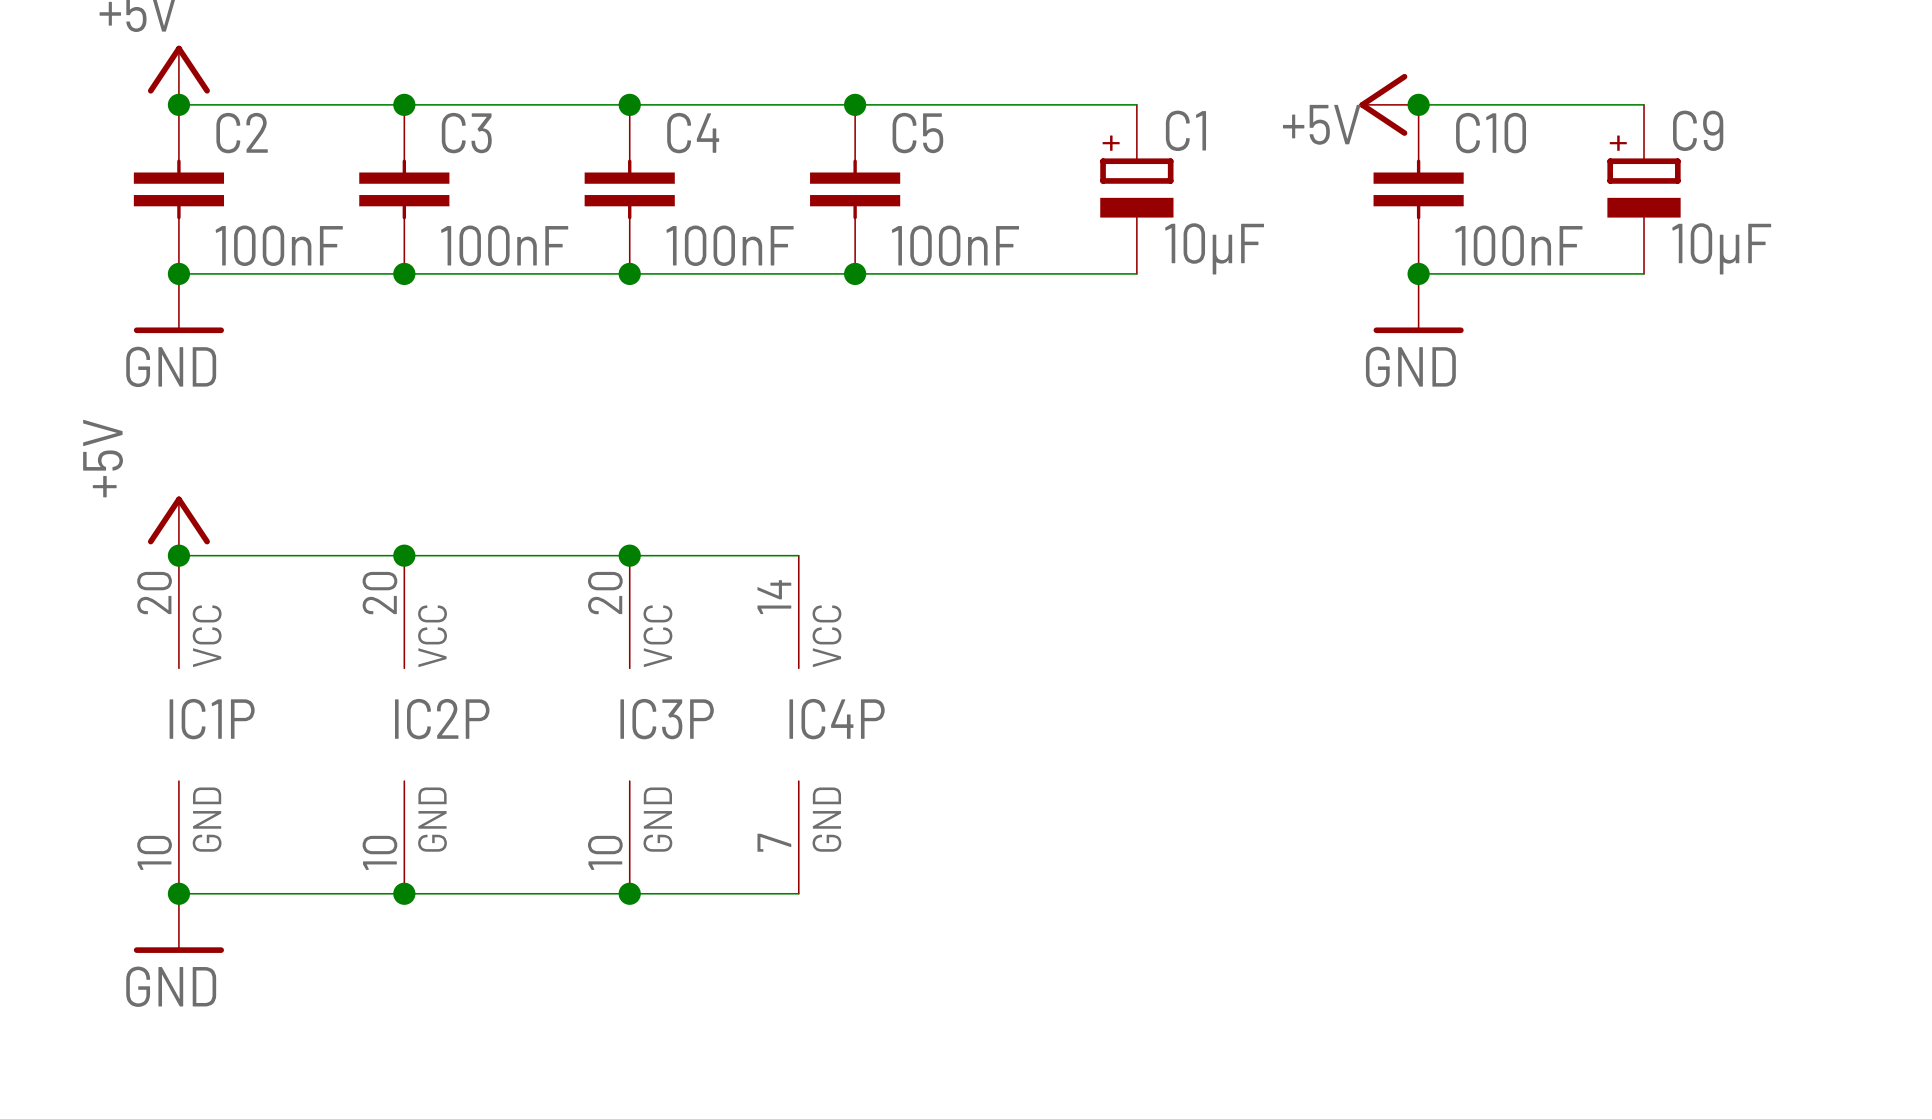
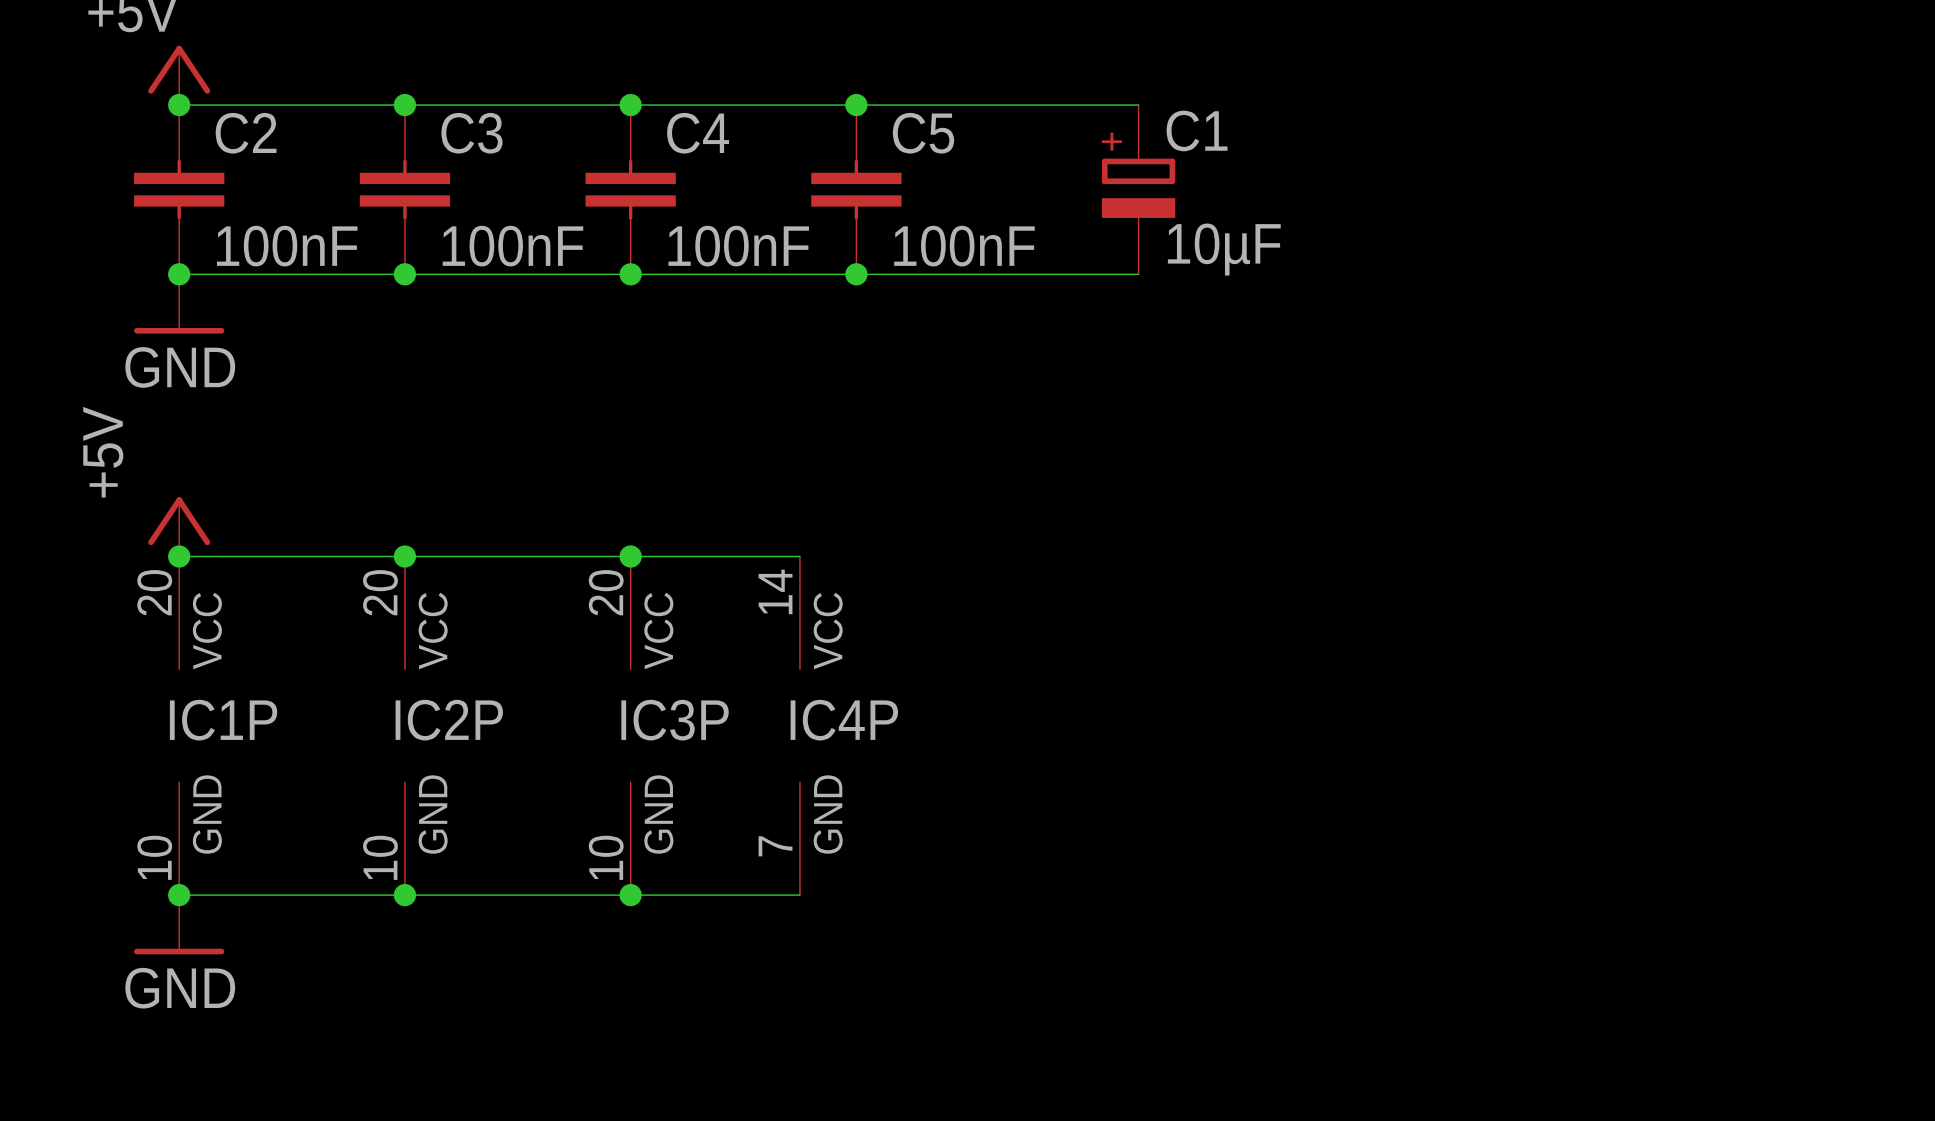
power symbol: +5V (1389, 104) -> none
wire: (1418, 104) (1644, 104) -> none
junction: (1418, 104) -> none
C10: 100nF (1418, 189) -> none
C9: 10µF (1644, 189) -> none
wire: (1418, 273) (1644, 273) -> none
junction: (1418, 273) -> none
power symbol: GND (1418, 303) -> none

